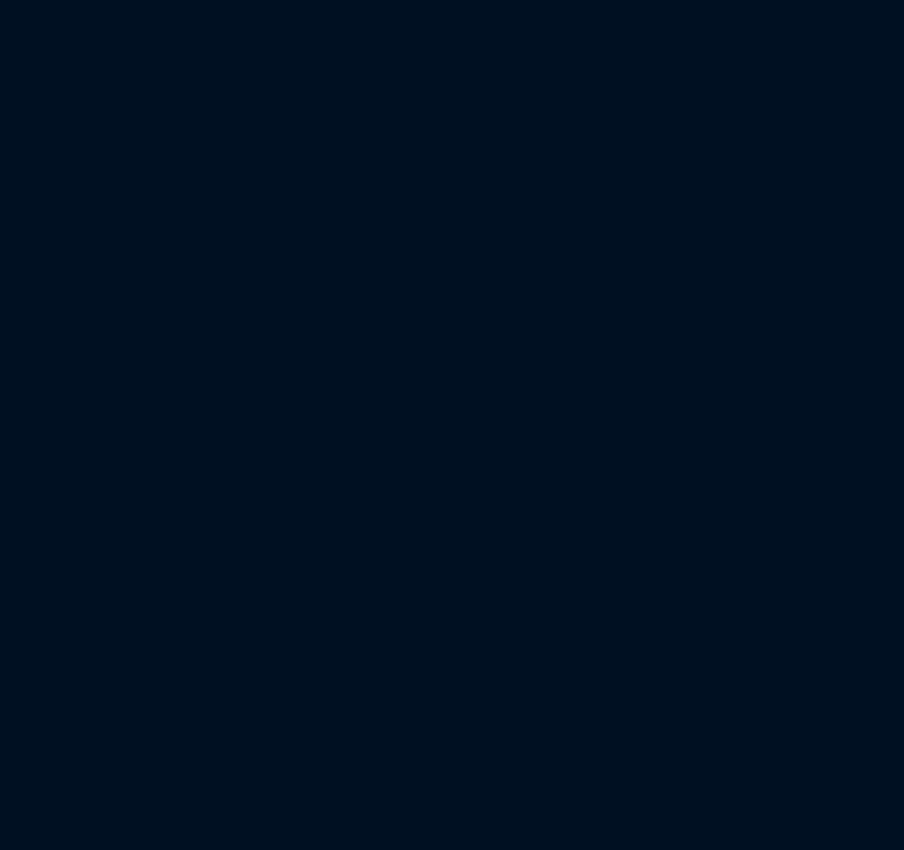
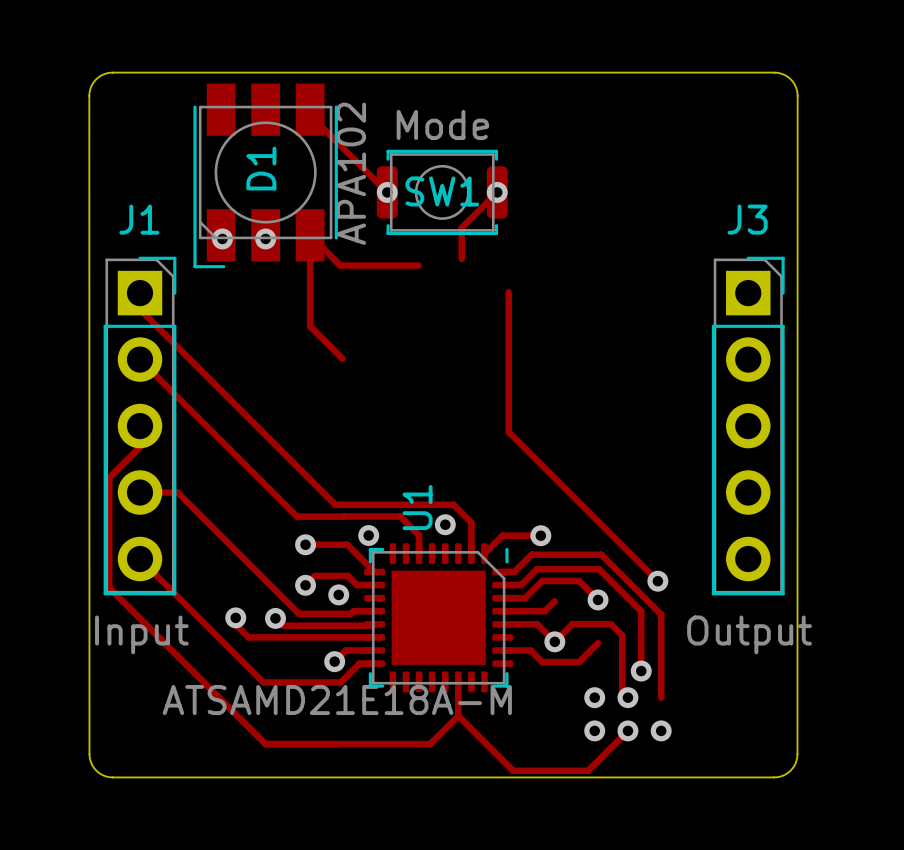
board edge: none -> (112, 72) (774, 72) (783, 74) (790, 79) (795, 86) (797, 95) (797, 754) (795, 763) (790, 770) (783, 775) (774, 777) (112, 777) (103, 775) (96, 770) (91, 763) (89, 754) (89, 95) (91, 86) (96, 79) (103, 74) (112, 72)
track: none -> (310, 109) (310, 115) (387, 192)
D1: none -> APA102 (265, 175)
via: none -> (387, 192)
SW1: none -> Mode (442, 192)
track: none -> (497, 192) (461, 227) (461, 258)
via: none -> (497, 192)
via: none -> (222, 238)
via: none -> (265, 238)
track: none -> (418, 265) (340, 265) (310, 235) (310, 326) (342, 358)
track: none -> (508, 292) (508, 432) (657, 581)
track: none -> (140, 293) (140, 309) (335, 504) (453, 504) (471, 522) (471, 553)
track: none -> (140, 359) (297, 516) (400, 516) (419, 535) (419, 553)
track: none -> (140, 426) (140, 447) (109, 477) (109, 587) (265, 744) (430, 744) (458, 715)
J1: none -> Input (140, 426)
J3: none -> Output (748, 426)
track: none -> (140, 492) (177, 492) (299, 613) (350, 613) (353, 611) (374, 611)
via: none -> (445, 524)
via: none -> (368, 535)
track: none -> (540, 535) (502, 535) (484, 553)
via: none -> (540, 535)
track: none -> (305, 544) (347, 544) (374, 571)
via: none -> (305, 544)
track: none -> (140, 559) (263, 682) (340, 682) (359, 663) (374, 663)
track: none -> (502, 571) (514, 571) (531, 554) (601, 554) (661, 614) (661, 697)
via: none -> (657, 581)
via: none -> (305, 585)
track: none -> (374, 585) (357, 585) (347, 575) (314, 575) (305, 585)
track: none -> (502, 585) (521, 585) (537, 569) (599, 569) (641, 611) (641, 671)
via: none -> (338, 594)
track: none -> (502, 598) (525, 598) (542, 580) (579, 580) (598, 599)
via: none -> (598, 599)
track: none -> (554, 601) (544, 611) (502, 611)
track: none -> (235, 617) (235, 624) (248, 637) (374, 637)
via: none -> (235, 617)
U1: none -> ATSAMD21E18A-M (438, 617)
track: none -> (275, 618) (282, 625) (374, 624)
via: none -> (275, 618)
track: none -> (502, 624) (537, 624) (554, 641) (572, 624) (610, 624) (622, 635) (622, 691) (627, 697)
via: none -> (554, 641)
track: none -> (598, 643) (579, 662) (542, 662) (530, 650) (502, 650)
track: none -> (374, 650) (345, 650) (334, 661)
via: none -> (334, 661)
via: none -> (641, 671)
track: none -> (458, 681) (458, 715)
via: none -> (594, 697)
via: none -> (627, 697)
track: none -> (458, 715) (513, 770) (588, 770) (627, 730)
via: none -> (594, 730)
via: none -> (627, 730)
via: none -> (661, 730)

